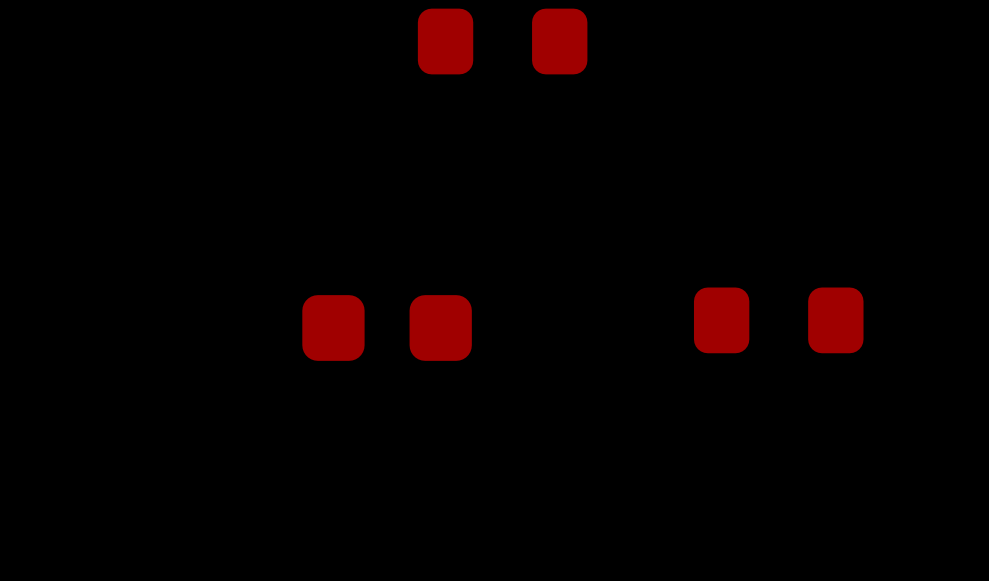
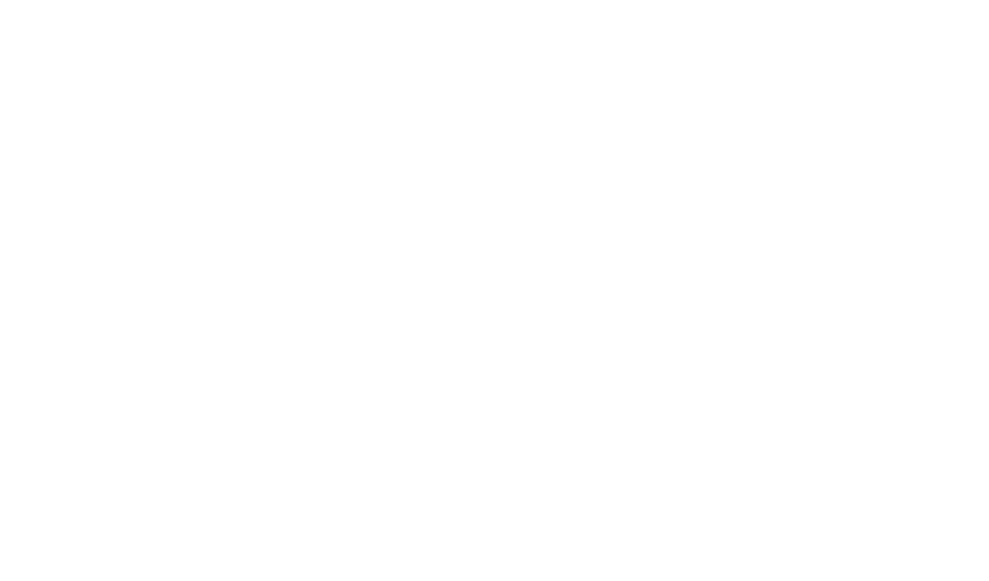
part: (502, 41) -> none
part: (778, 320) -> none
part: (387, 327) -> none

